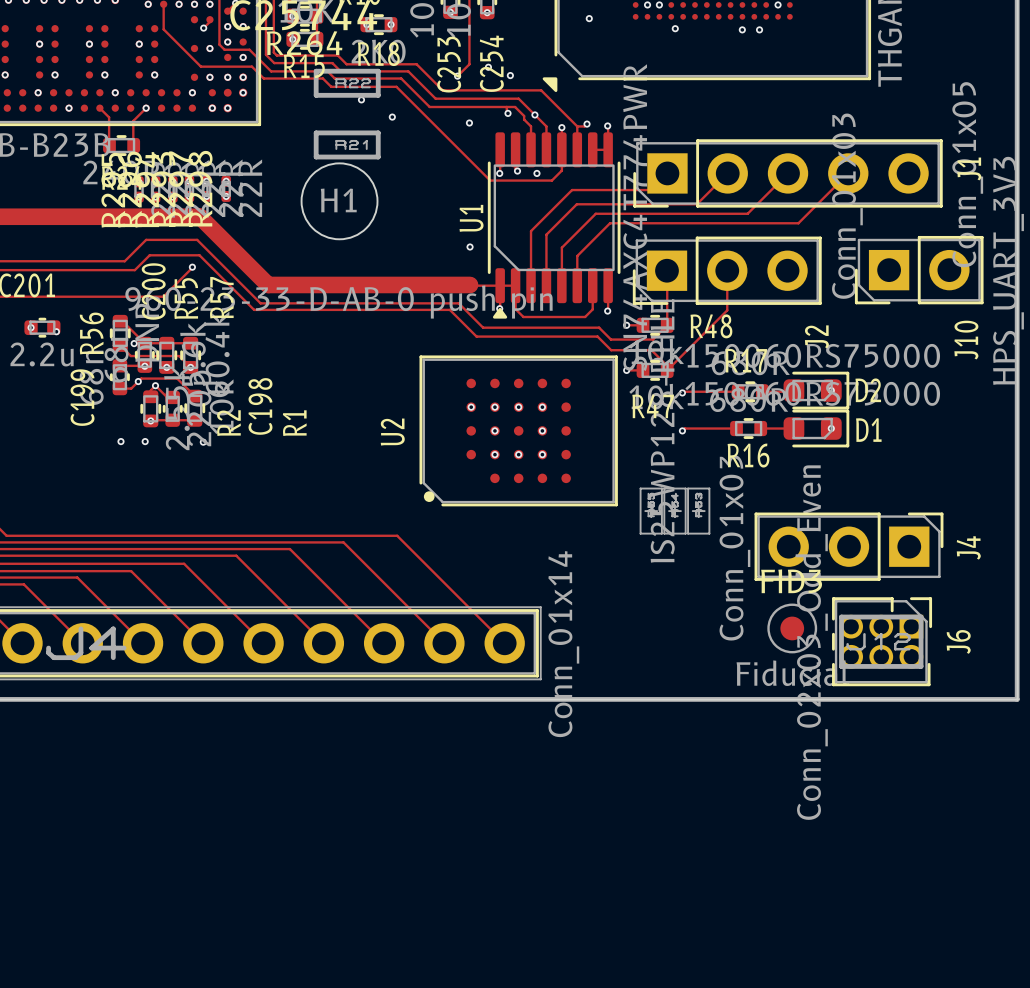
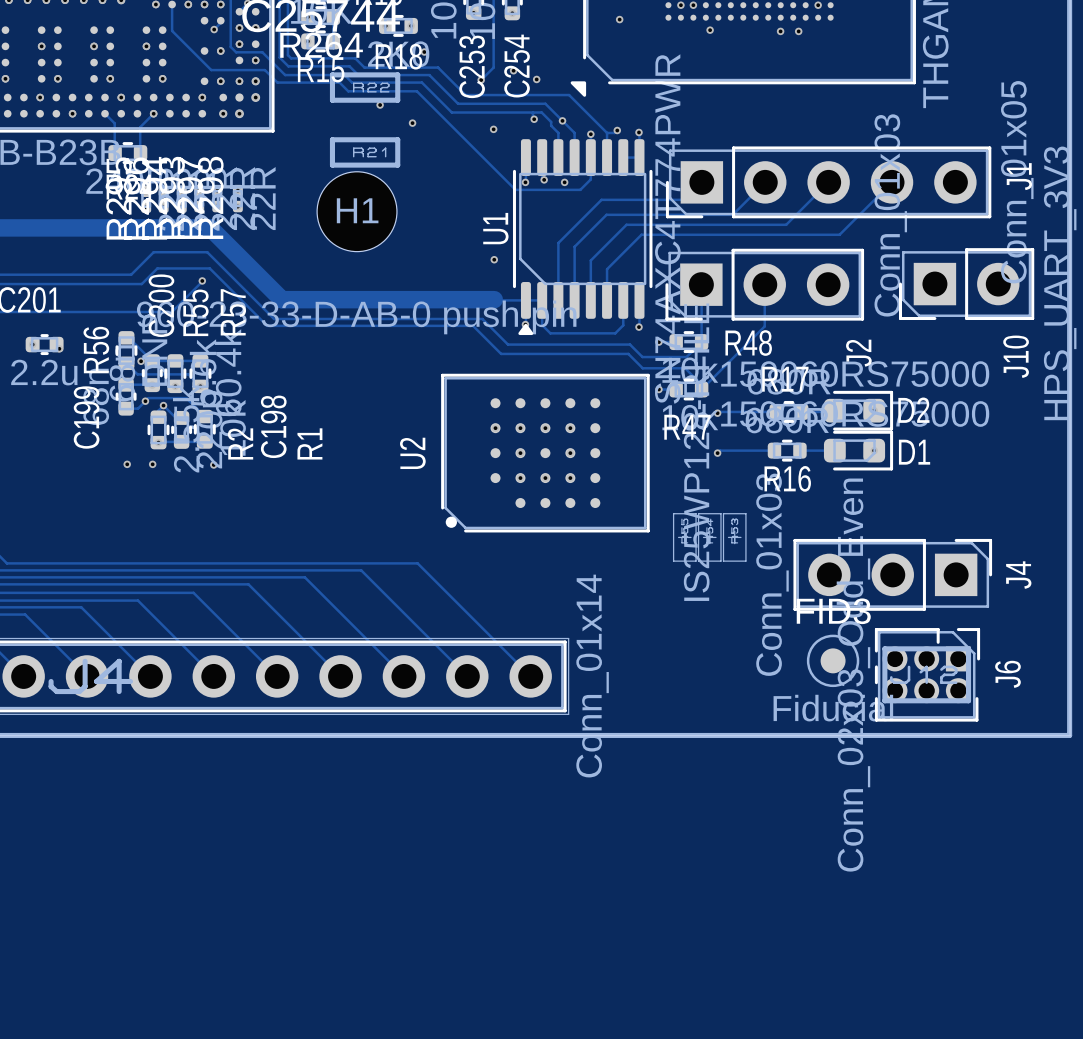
via: none -> (424, 52)

